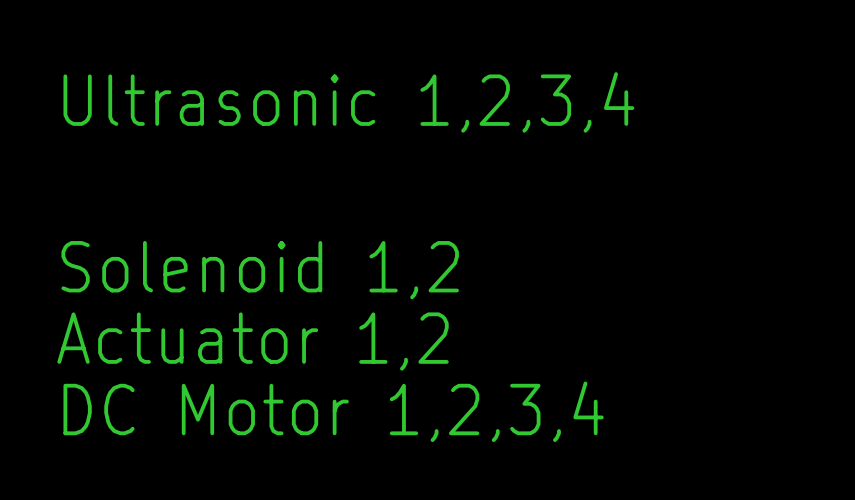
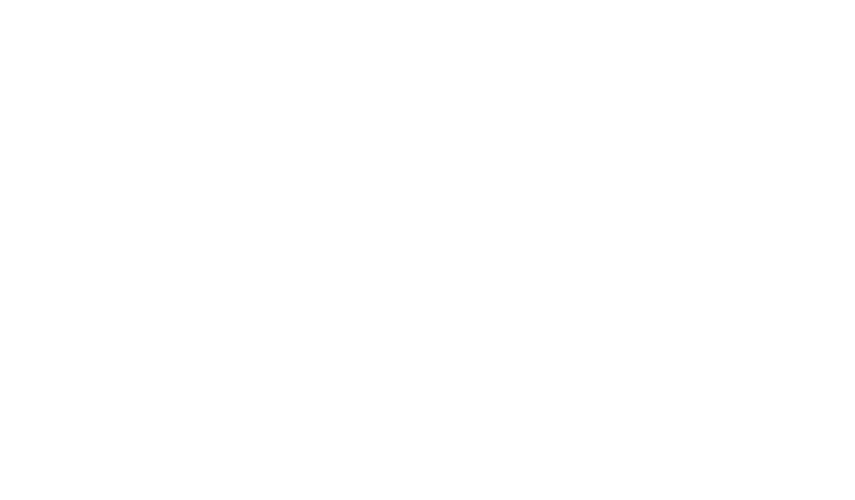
text: Ultrasonic 1,2,3,4 (348, 102) -> none
text: Solenoid 1,2 (260, 270) -> none
text: Actuator 1,2 (253, 341) -> none
text: DC Motor 1,2,3,4 (333, 411) -> none

